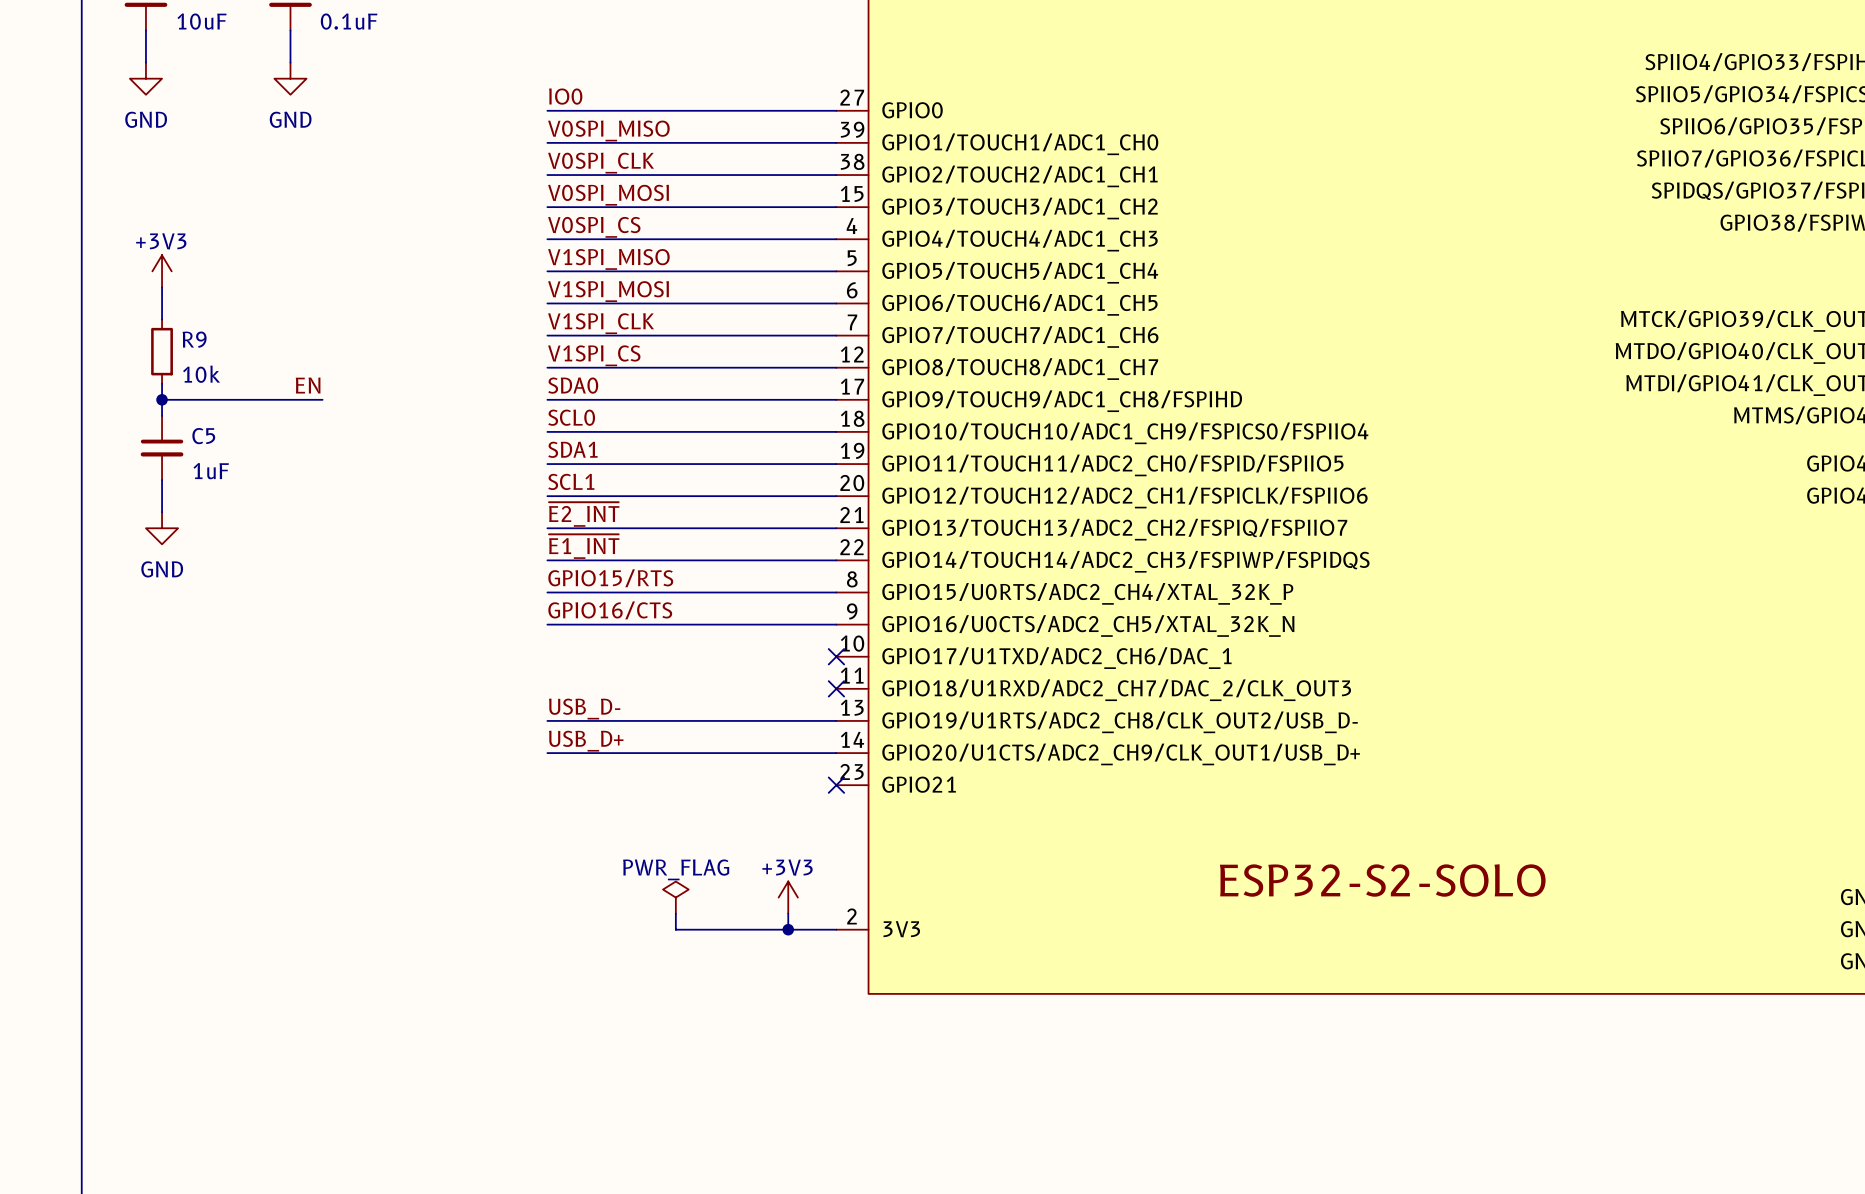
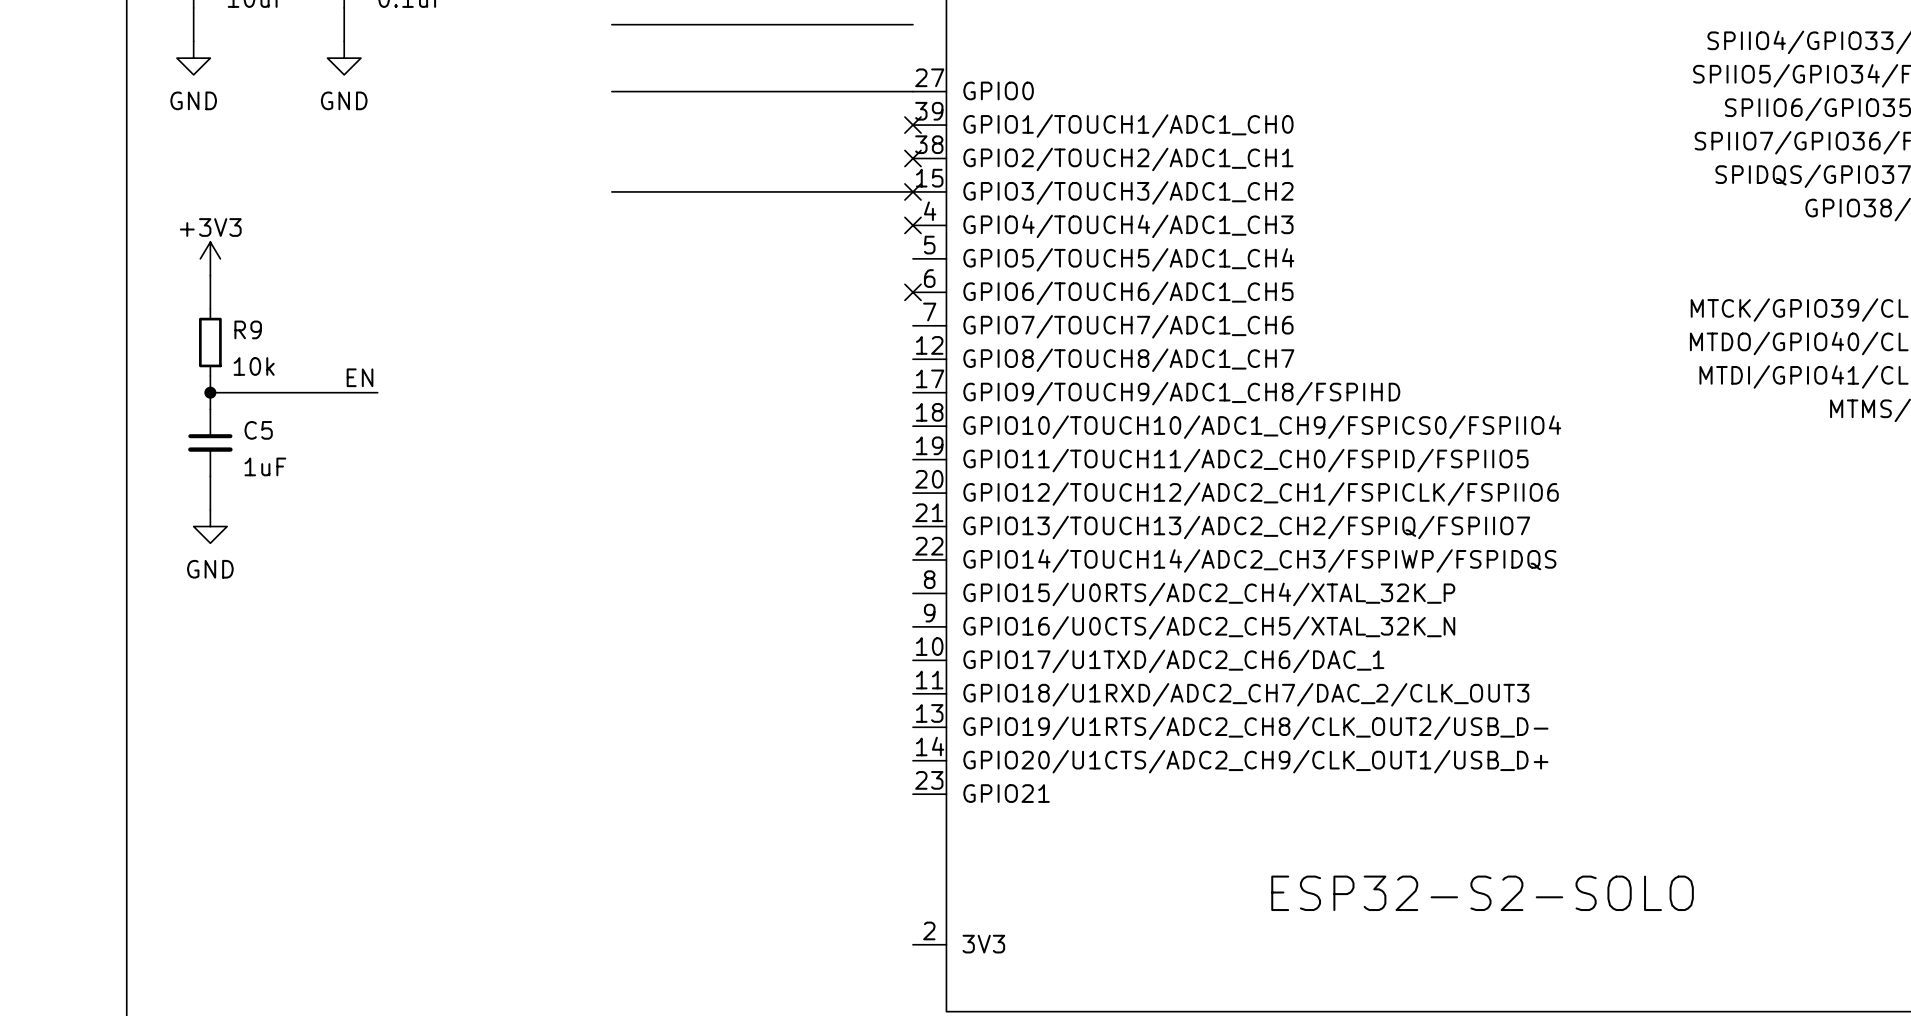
label: IO0 (565, 96) -> none
label: V0SPI_MISO (608, 130) -> none
wire: (547, 142) (836, 142) -> (611, 24) (912, 24)
no-connect mark: none -> (912, 125)
label: V0SPI_CLK (601, 163) -> none
wire: (547, 175) (836, 175) -> none
no-connect mark: none -> (912, 158)
label: V0SPI_MOSI (608, 195) -> none
no-connect mark: none -> (912, 191)
label: V0SPI_CS (594, 227) -> none
wire: (547, 239) (836, 239) -> none
no-connect mark: none -> (912, 225)
label: V1SPI_MISO (608, 259) -> none
wire: (547, 271) (836, 271) -> none
label: V1SPI_MOSI (608, 291) -> none
wire: (547, 303) (836, 303) -> none
no-connect mark: none -> (912, 292)
label: V1SPI_CLK (601, 323) -> none
wire: (547, 335) (836, 335) -> none
label: V1SPI_CS (594, 355) -> none
wire: (547, 367) (836, 367) -> none
label: SDA0 (573, 385) -> none
wire: (547, 399) (836, 399) -> none
label: SCL0 (571, 417) -> none
wire: (547, 431) (836, 431) -> none
label: SDA1 (572, 449) -> none
wire: (547, 464) (836, 464) -> none
label: SCL1 (571, 481) -> none
wire: (547, 496) (836, 496) -> none
label: ~{E2_INT} (584, 514) -> none
wire: (547, 528) (836, 528) -> none
label: ~{E1_INT} (584, 546) -> none
wire: (547, 560) (836, 560) -> none
label: GPIO15/RTS (610, 578) -> none
wire: (547, 592) (836, 592) -> none
label: GPIO16/CTS (610, 610) -> none
wire: (547, 624) (836, 624) -> none
no-connect mark: (836, 656) -> none
no-connect mark: (836, 688) -> none
label: USB_D- (584, 709) -> none
wire: (547, 720) (836, 720) -> none
label: USB_D+ (586, 741) -> none
wire: (547, 753) (836, 753) -> none
no-connect mark: (836, 785) -> none
power symbol: PWR_FLAG (675, 897) -> none
power symbol: +3V3 (788, 897) -> none
wire: (675, 913) (675, 929) (836, 929) -> none
wire: (788, 913) (788, 929) -> none
junction: (788, 929) -> none

